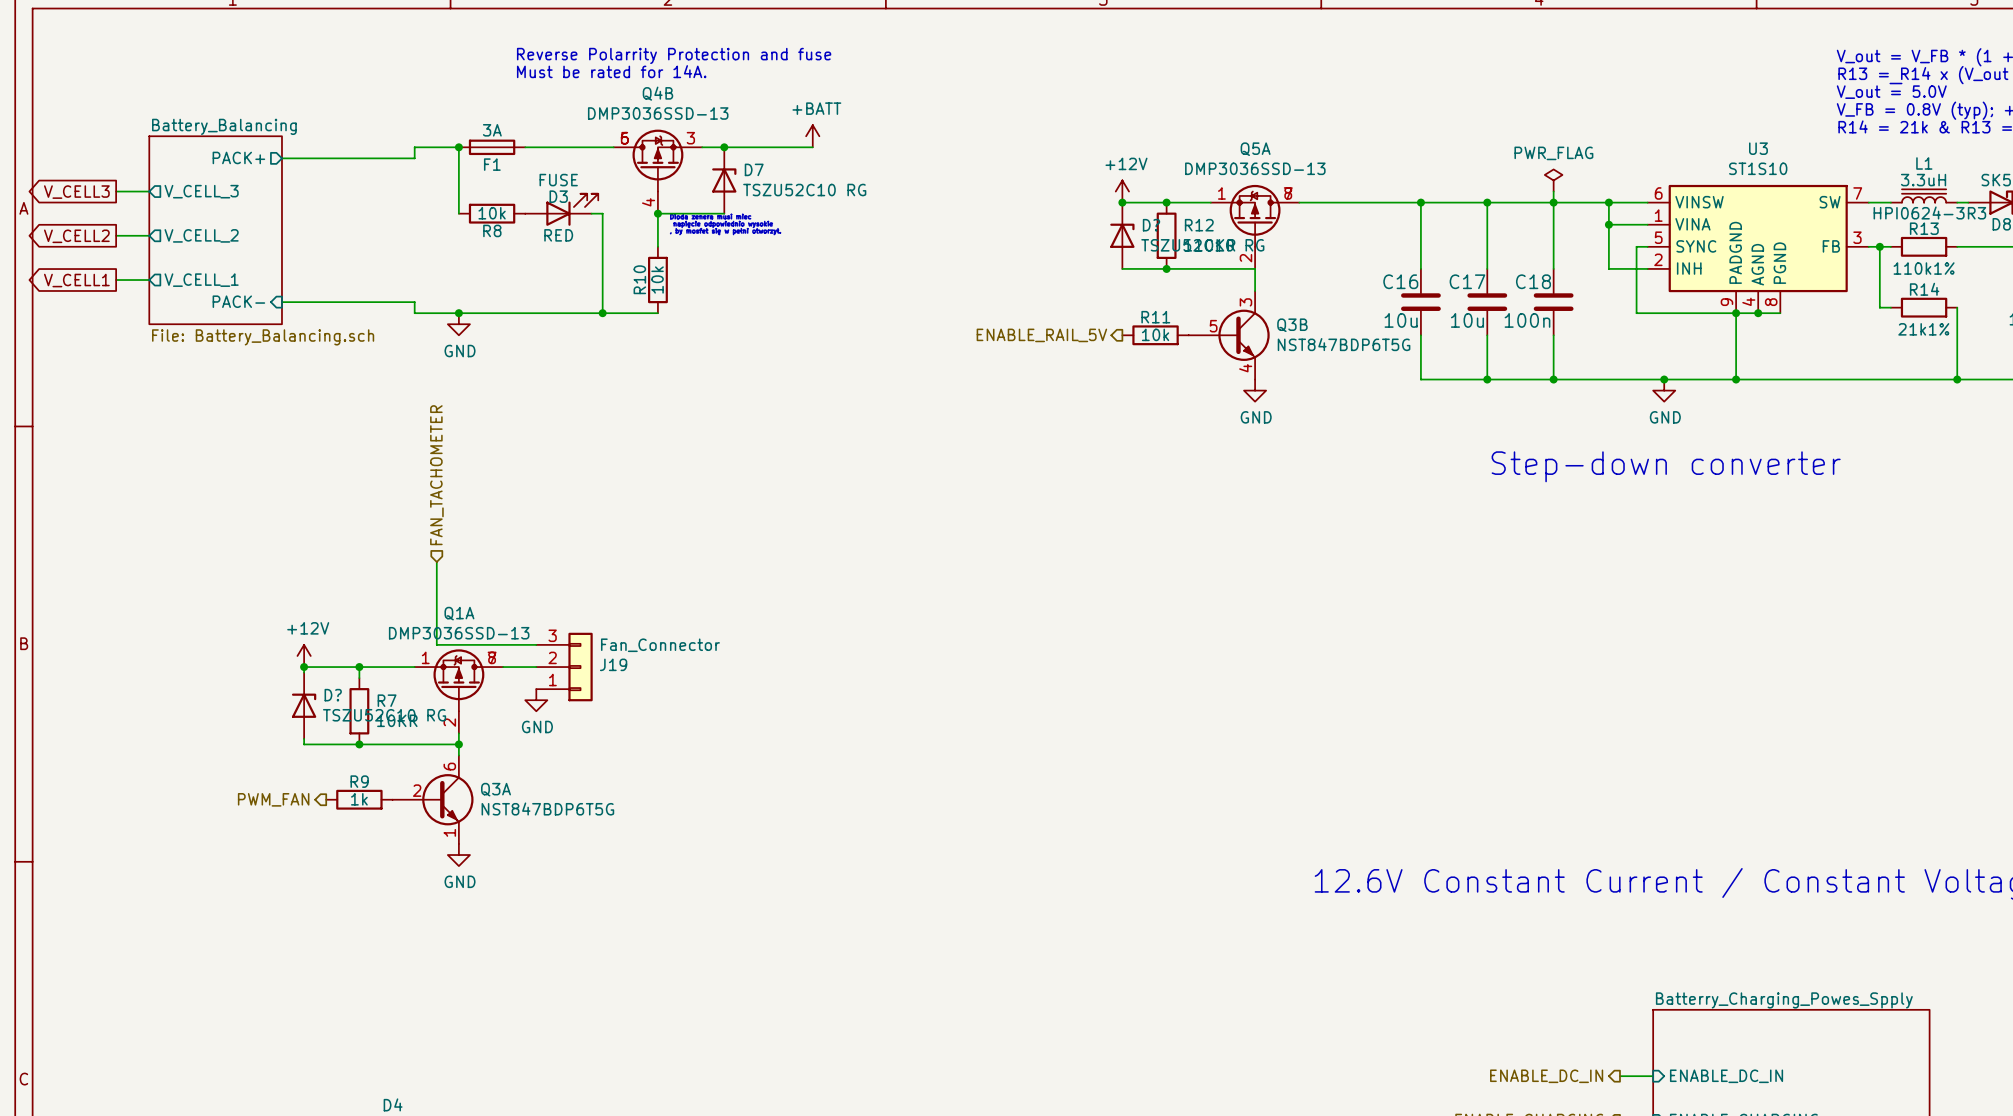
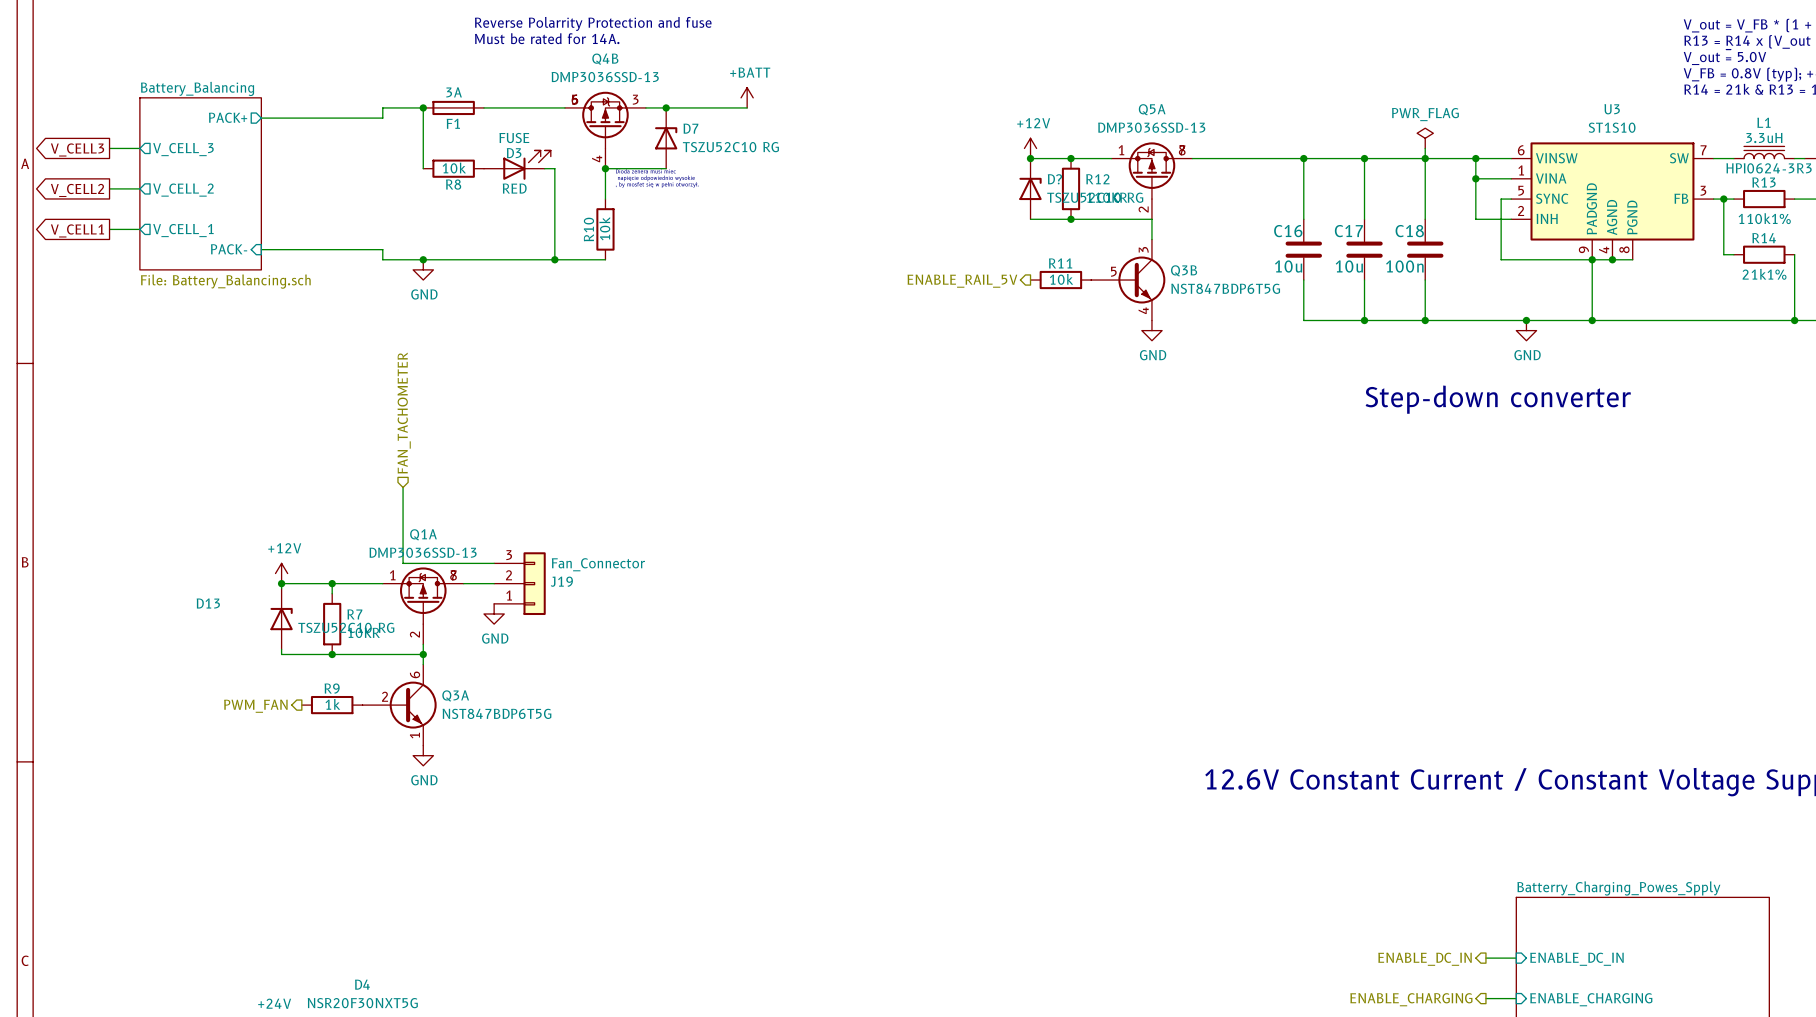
D? name: D? (333, 695) -> D13 (208, 603)

